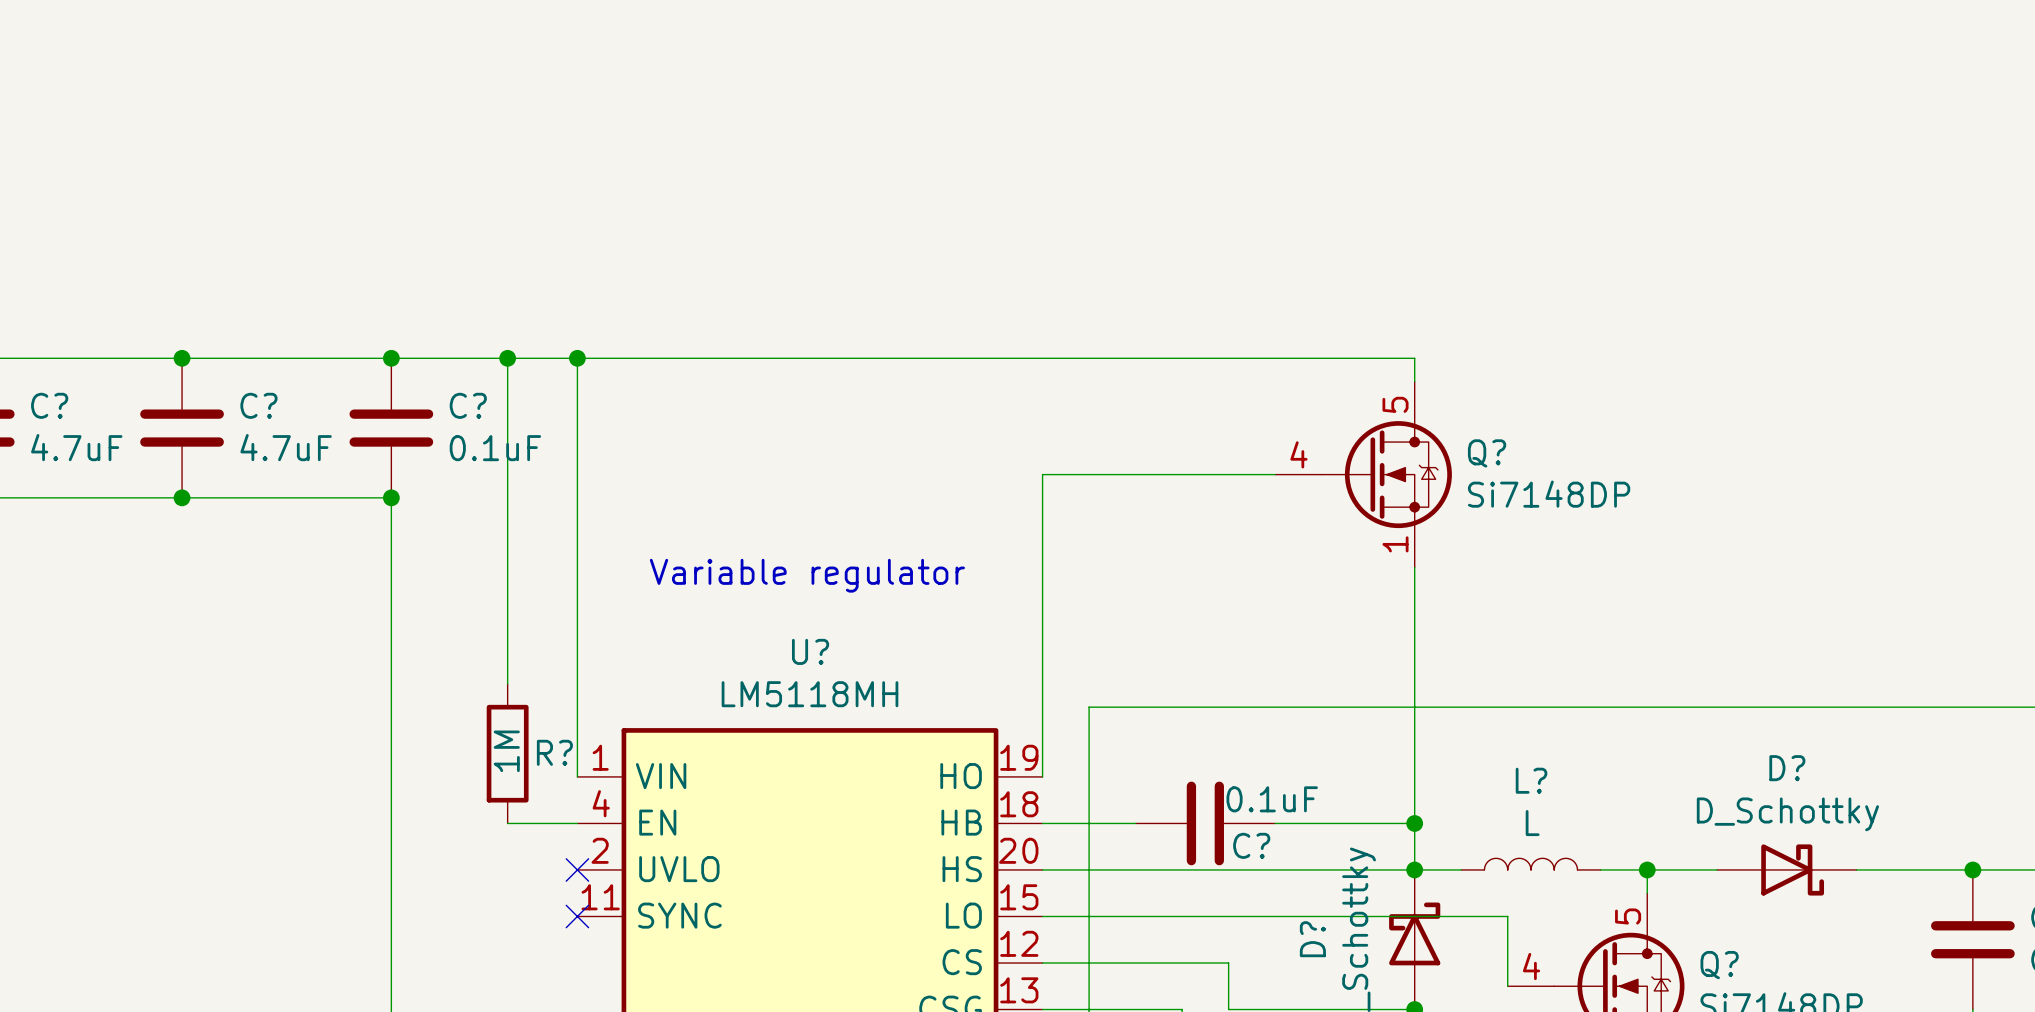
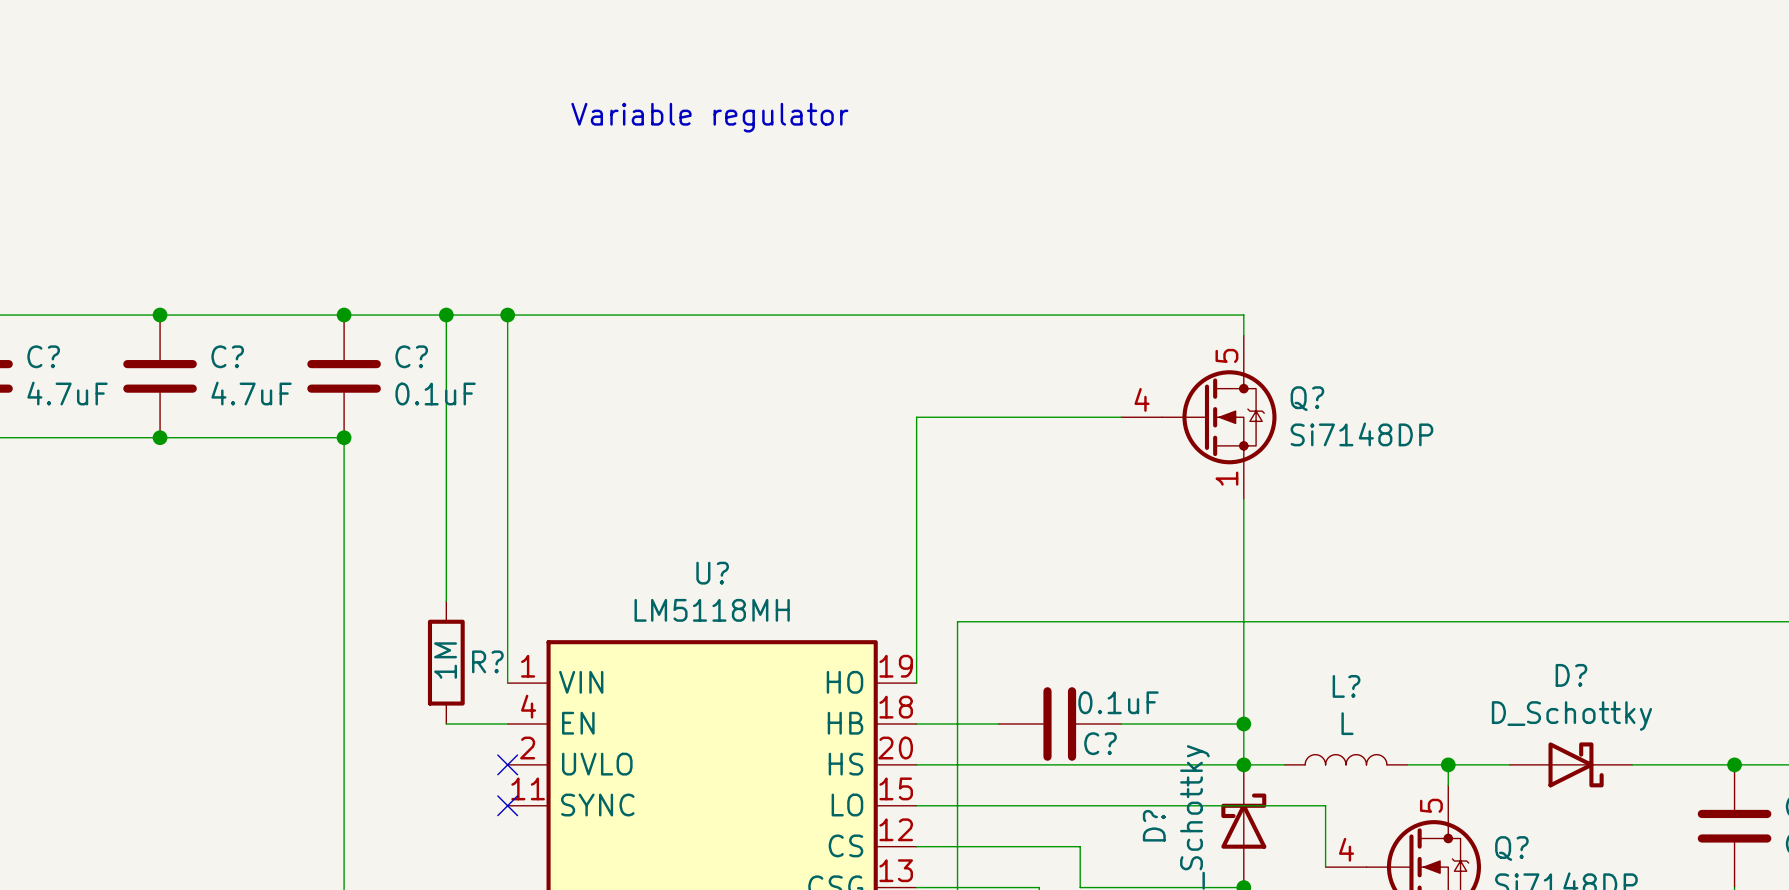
text position: Variable regulator (807, 575) -> Variable regulator (709, 117)

